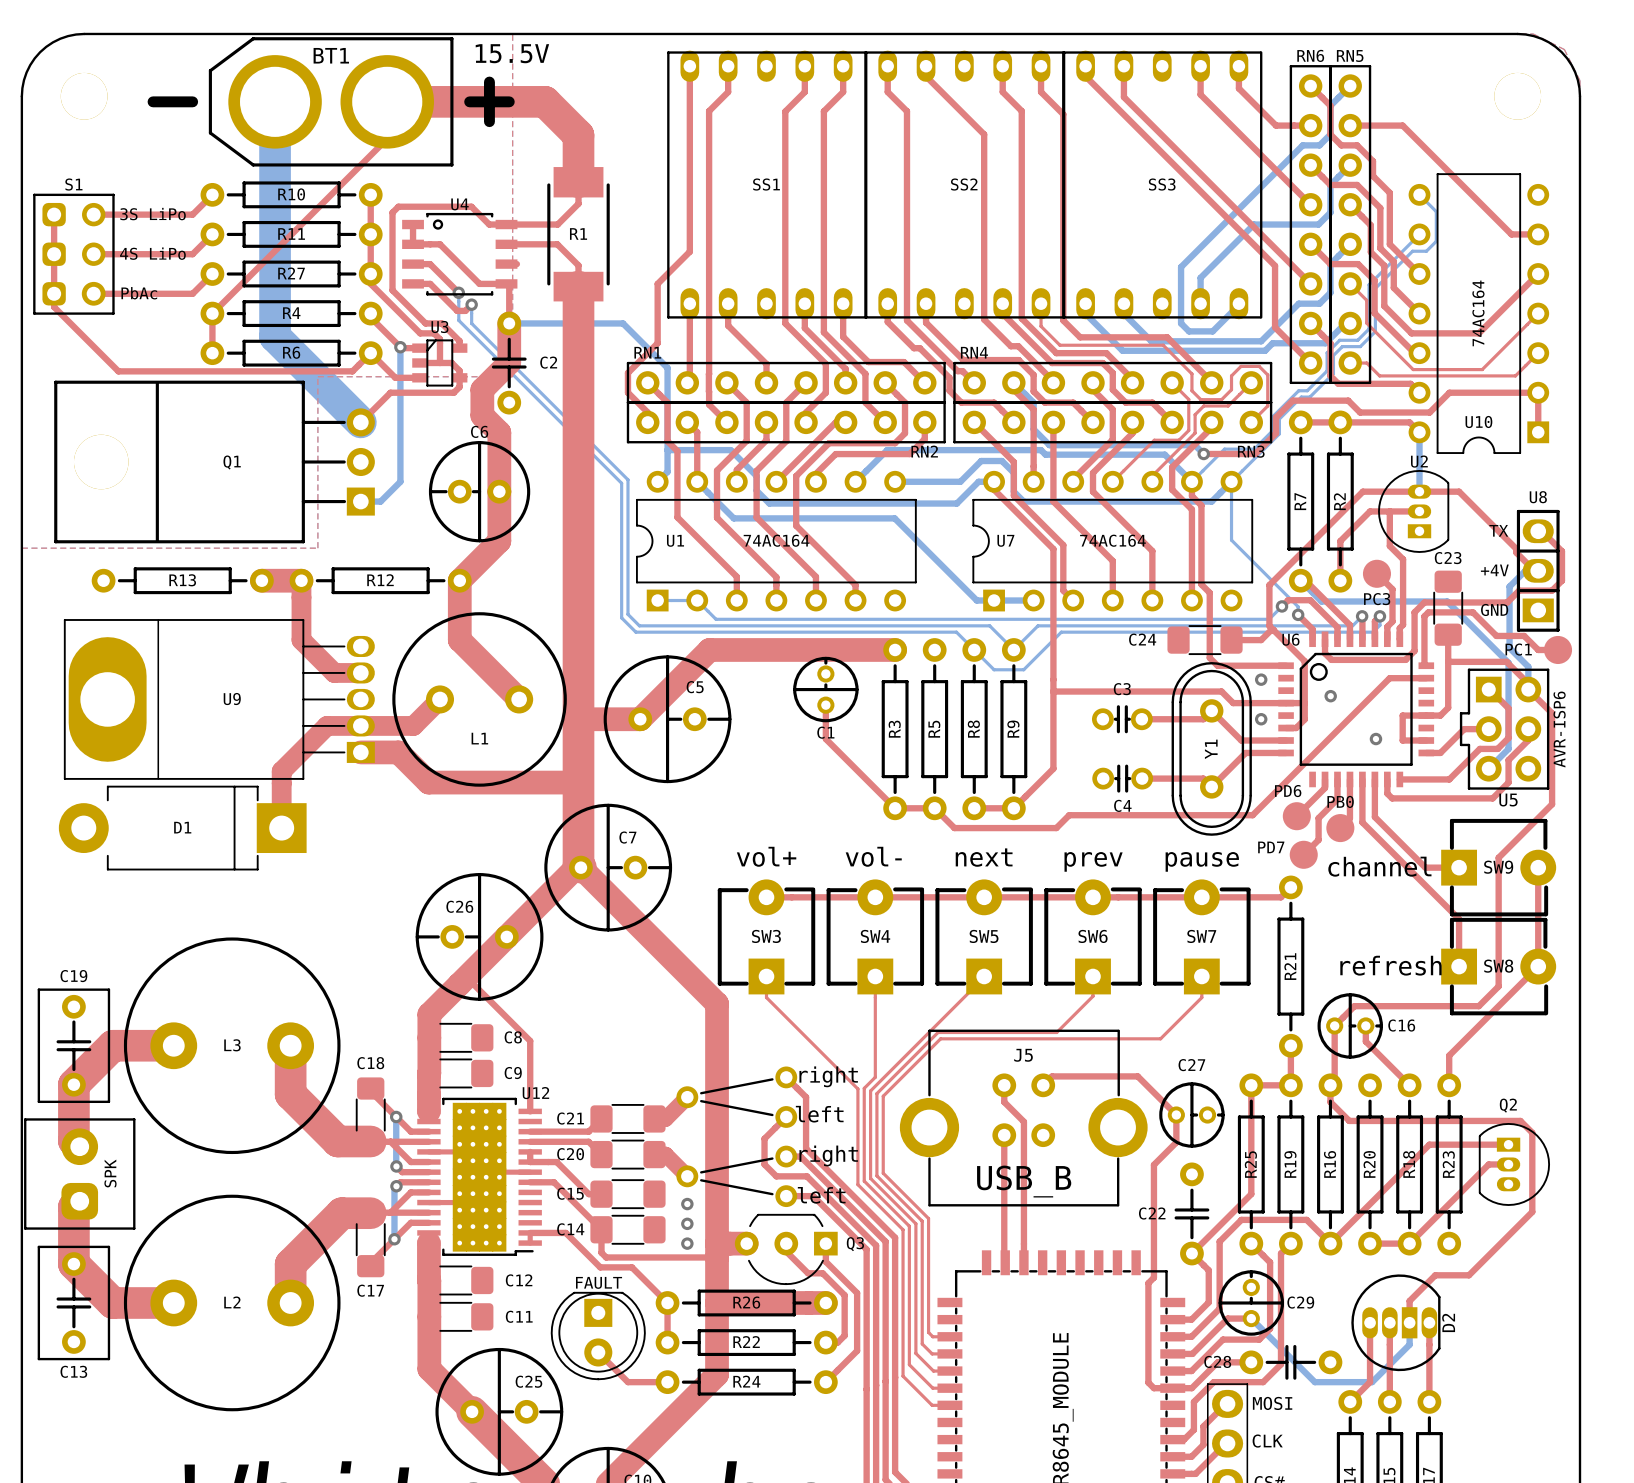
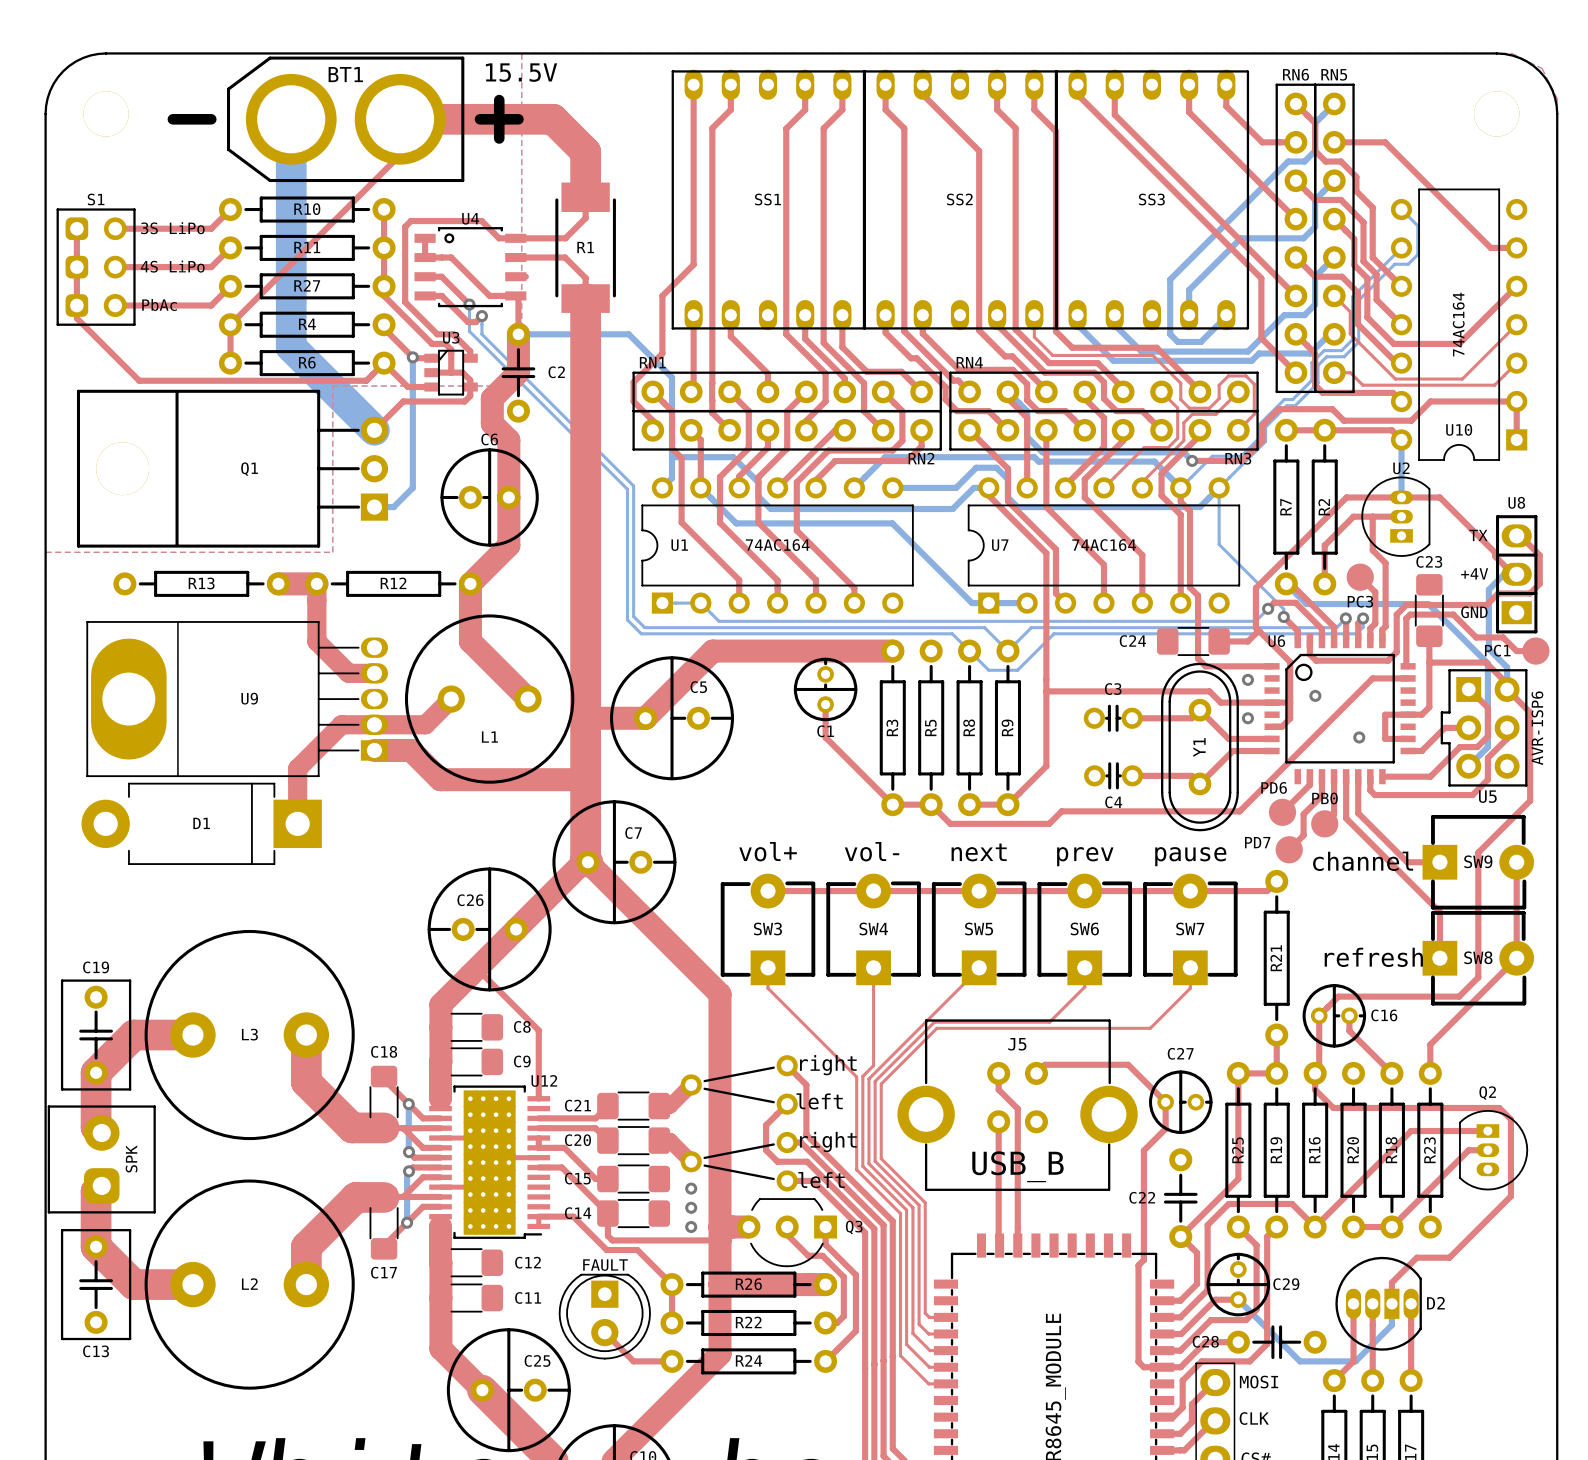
D2 name rotation: 0° (1448, 1322) -> 90° clockwise (1435, 1303)

